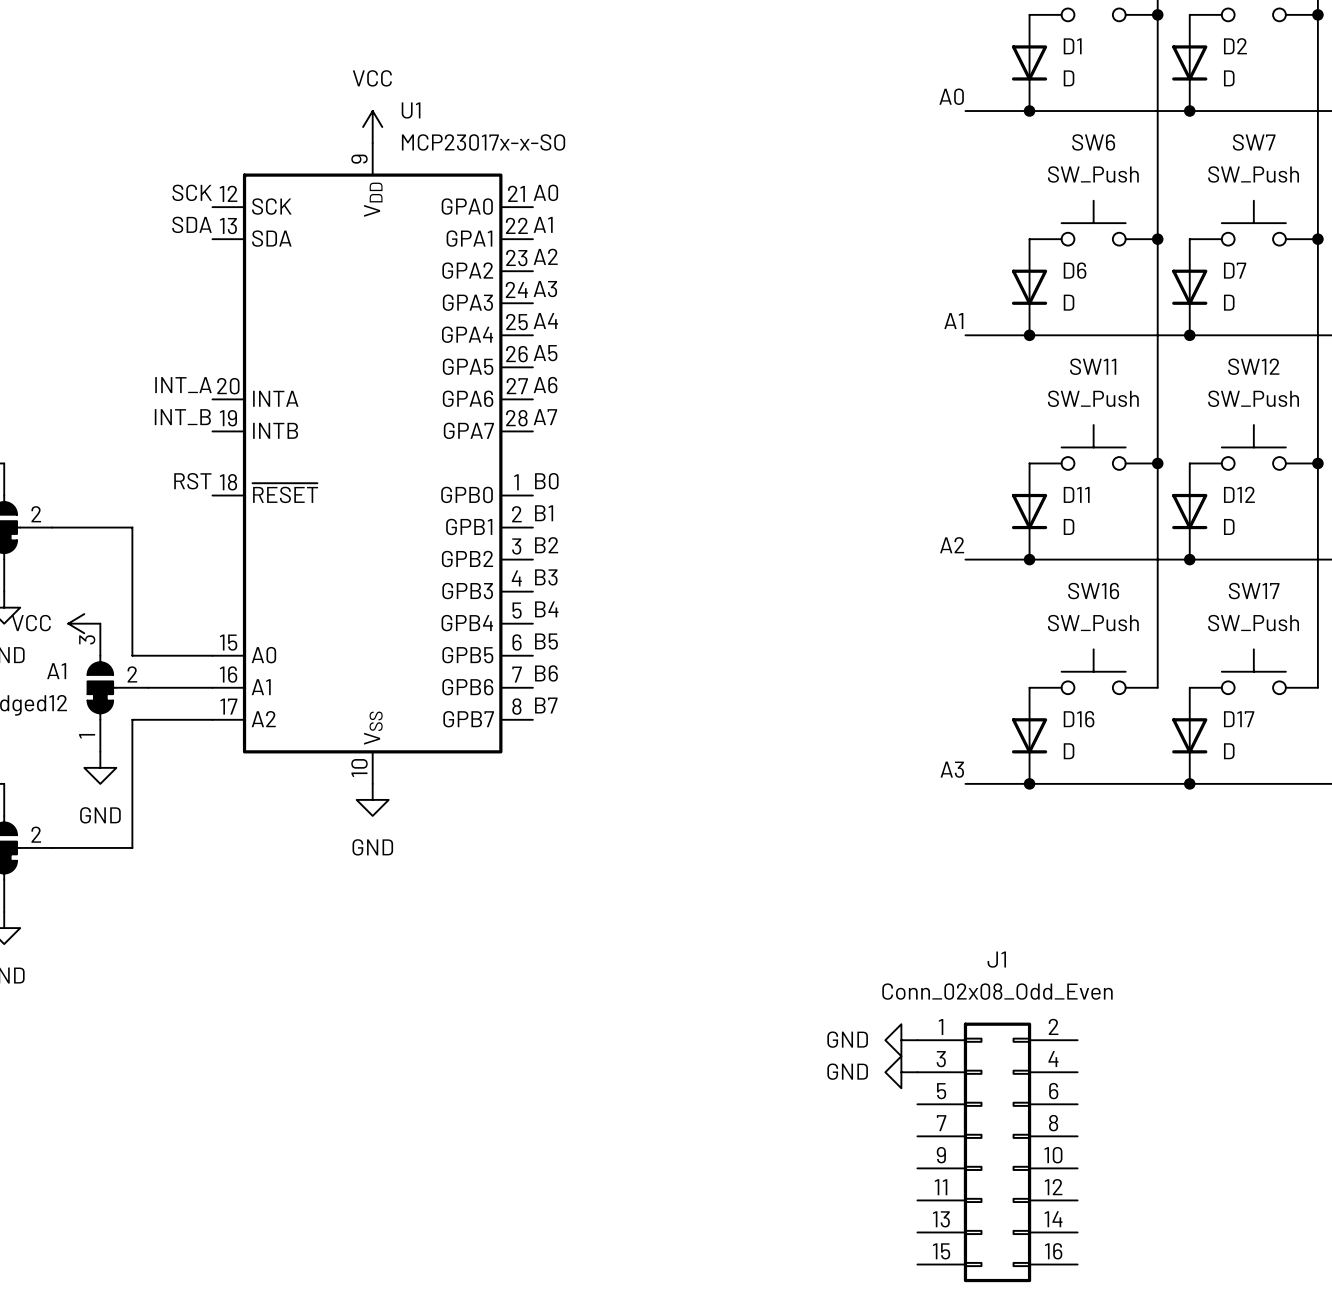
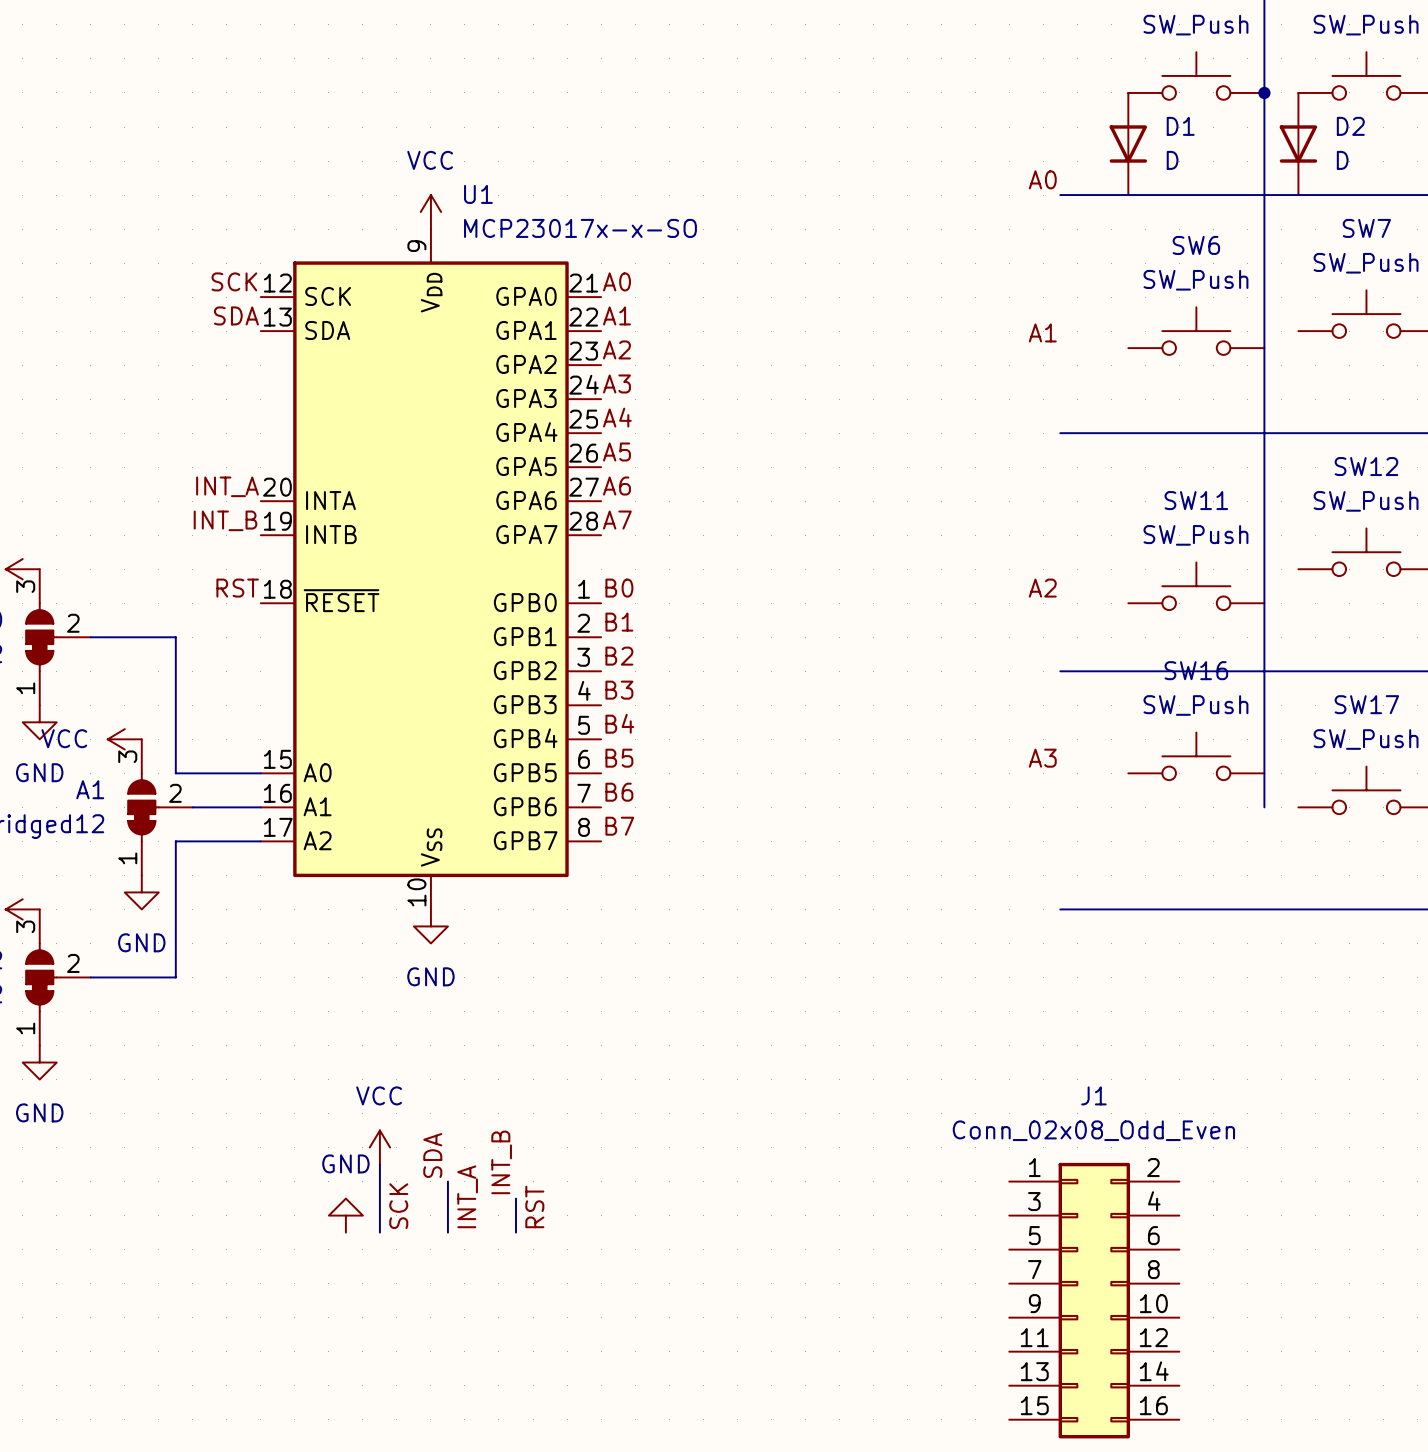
junction: (1029, 111) -> none
junction: (1189, 111) -> none
SW6 position: (1093, 223) -> (1196, 331)
junction: (1157, 239) -> none
D6: D (1029, 287) -> none
D7: D (1189, 287) -> none
label position: A1 (953, 321) -> A1 (1042, 332)
junction: (1029, 335) -> none
junction: (1189, 335) -> none
SW11 position: (1093, 447) -> (1196, 586)
junction: (1157, 463) -> none
D11: D (1029, 511) -> none
D12: D (1189, 511) -> none
label position: A2 (952, 545) -> A2 (1042, 588)
junction: (1029, 559) -> none
junction: (1189, 559) -> none
SW16 position: (1093, 671) -> (1196, 756)
D16: D (1029, 735) -> none
D17: D (1189, 735) -> none
label position: A3 (952, 769) -> A3 (1042, 758)
junction: (1029, 783) -> none
junction: (1189, 783) -> none
power symbol: none -> VCC (379, 1147)
label: none -> SDA (432, 1155)
wire: none -> (379, 1164) (379, 1232)
label: none -> INT_B (501, 1162)
wire: none -> (447, 1181) (447, 1232)
power symbol: GND (901, 1040) -> none
wire: none -> (515, 1198) (515, 1232)
label: none -> INT_A (467, 1196)
label: none -> SCK (398, 1206)
label: none -> RST (534, 1206)
power symbol: none -> GND (345, 1215)
power symbol: GND (901, 1072) -> none

